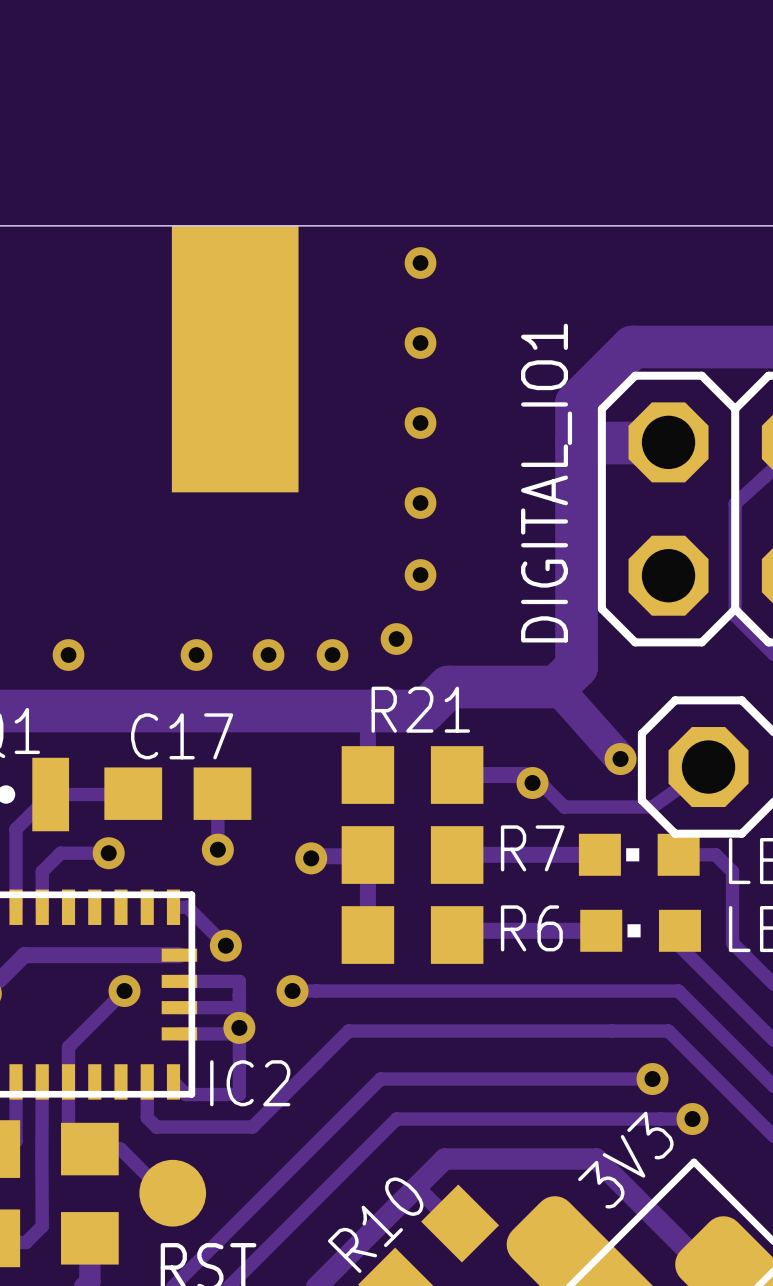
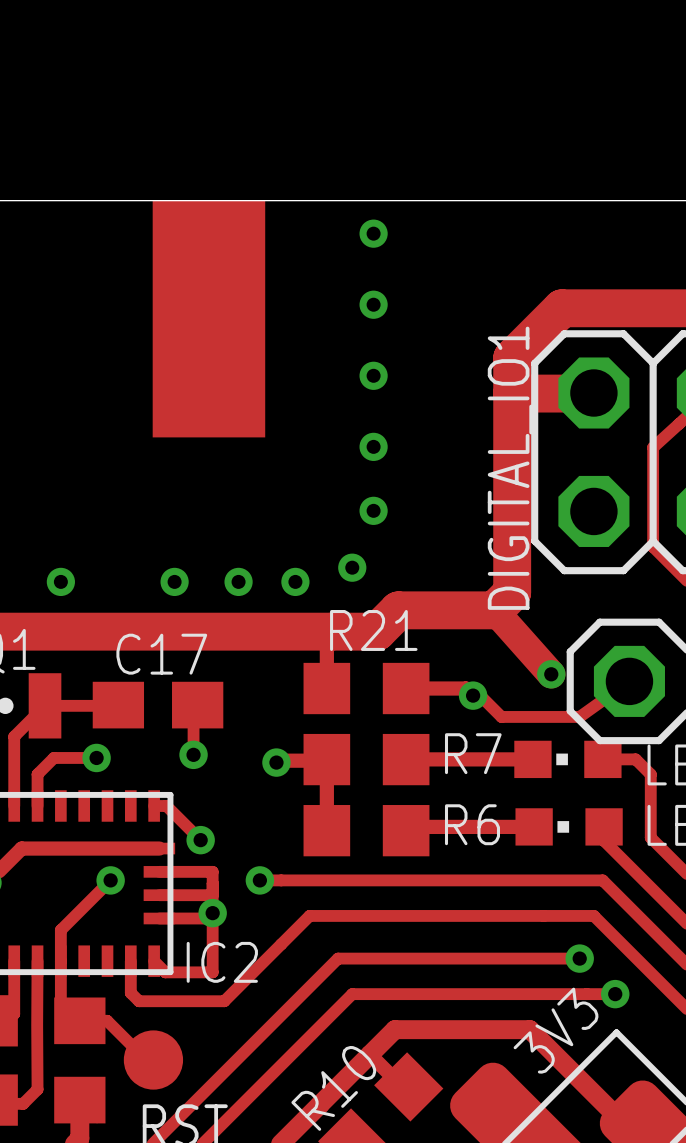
DIGITAL_IO1 name position: DIGITAL_IO1 (546, 483) -> DIGITAL_IO1 (510, 468)

